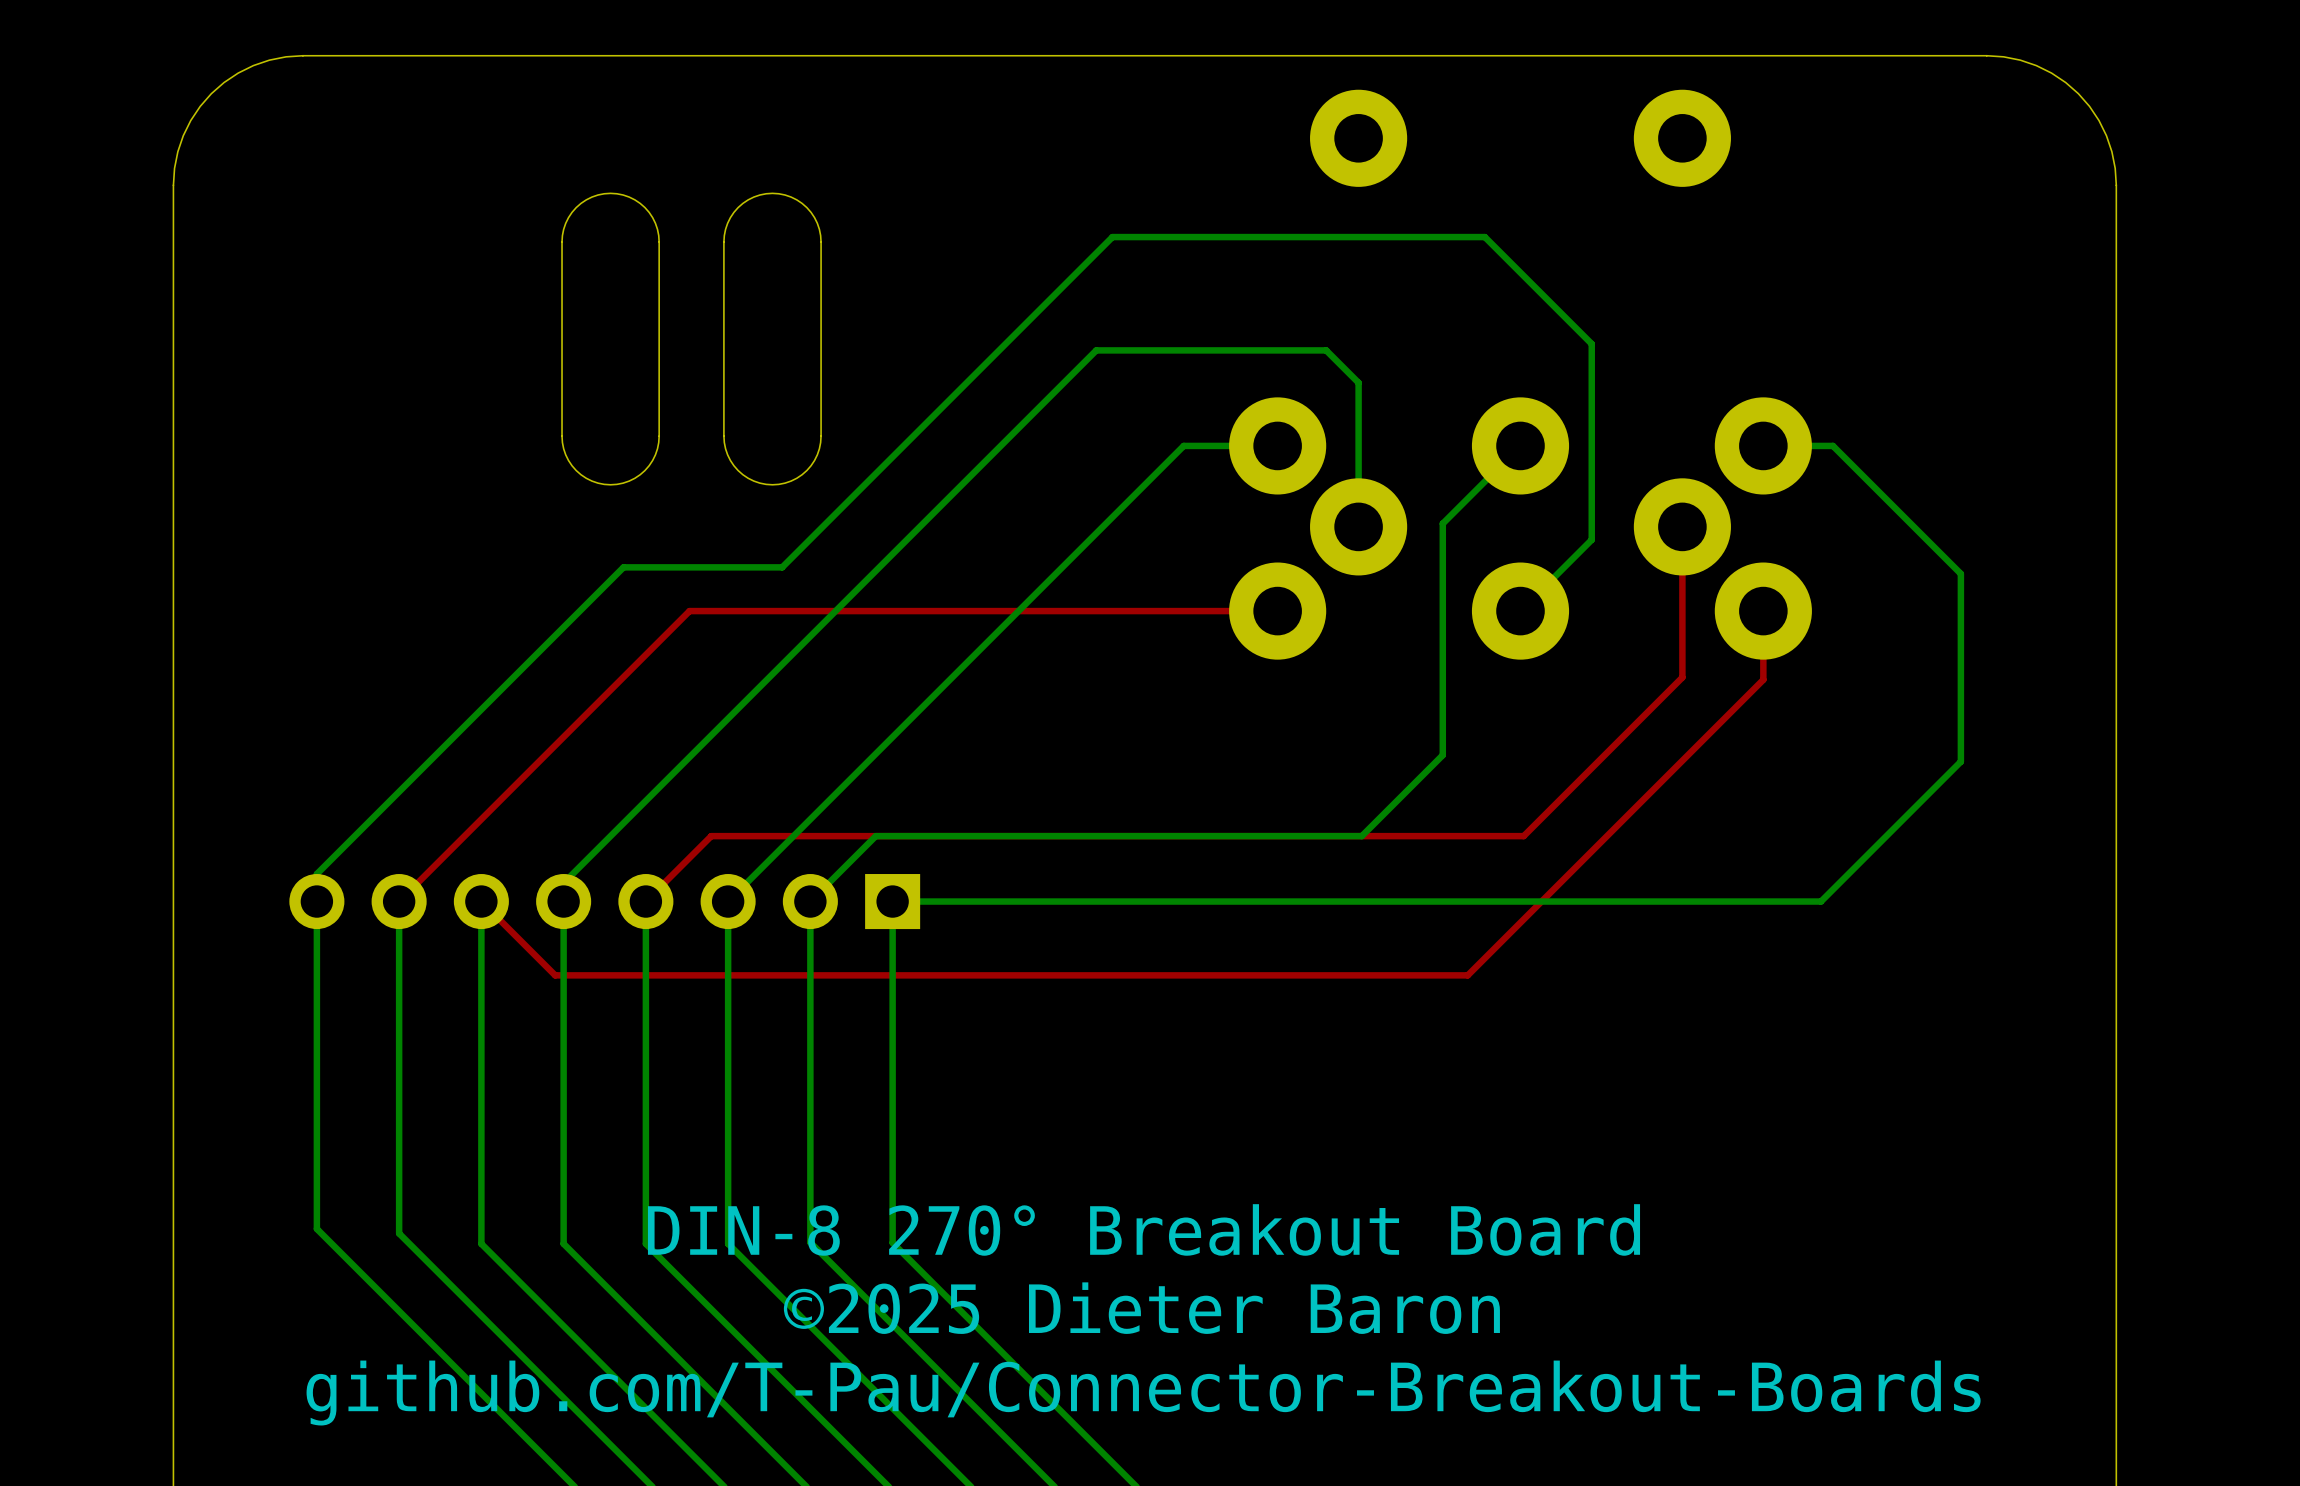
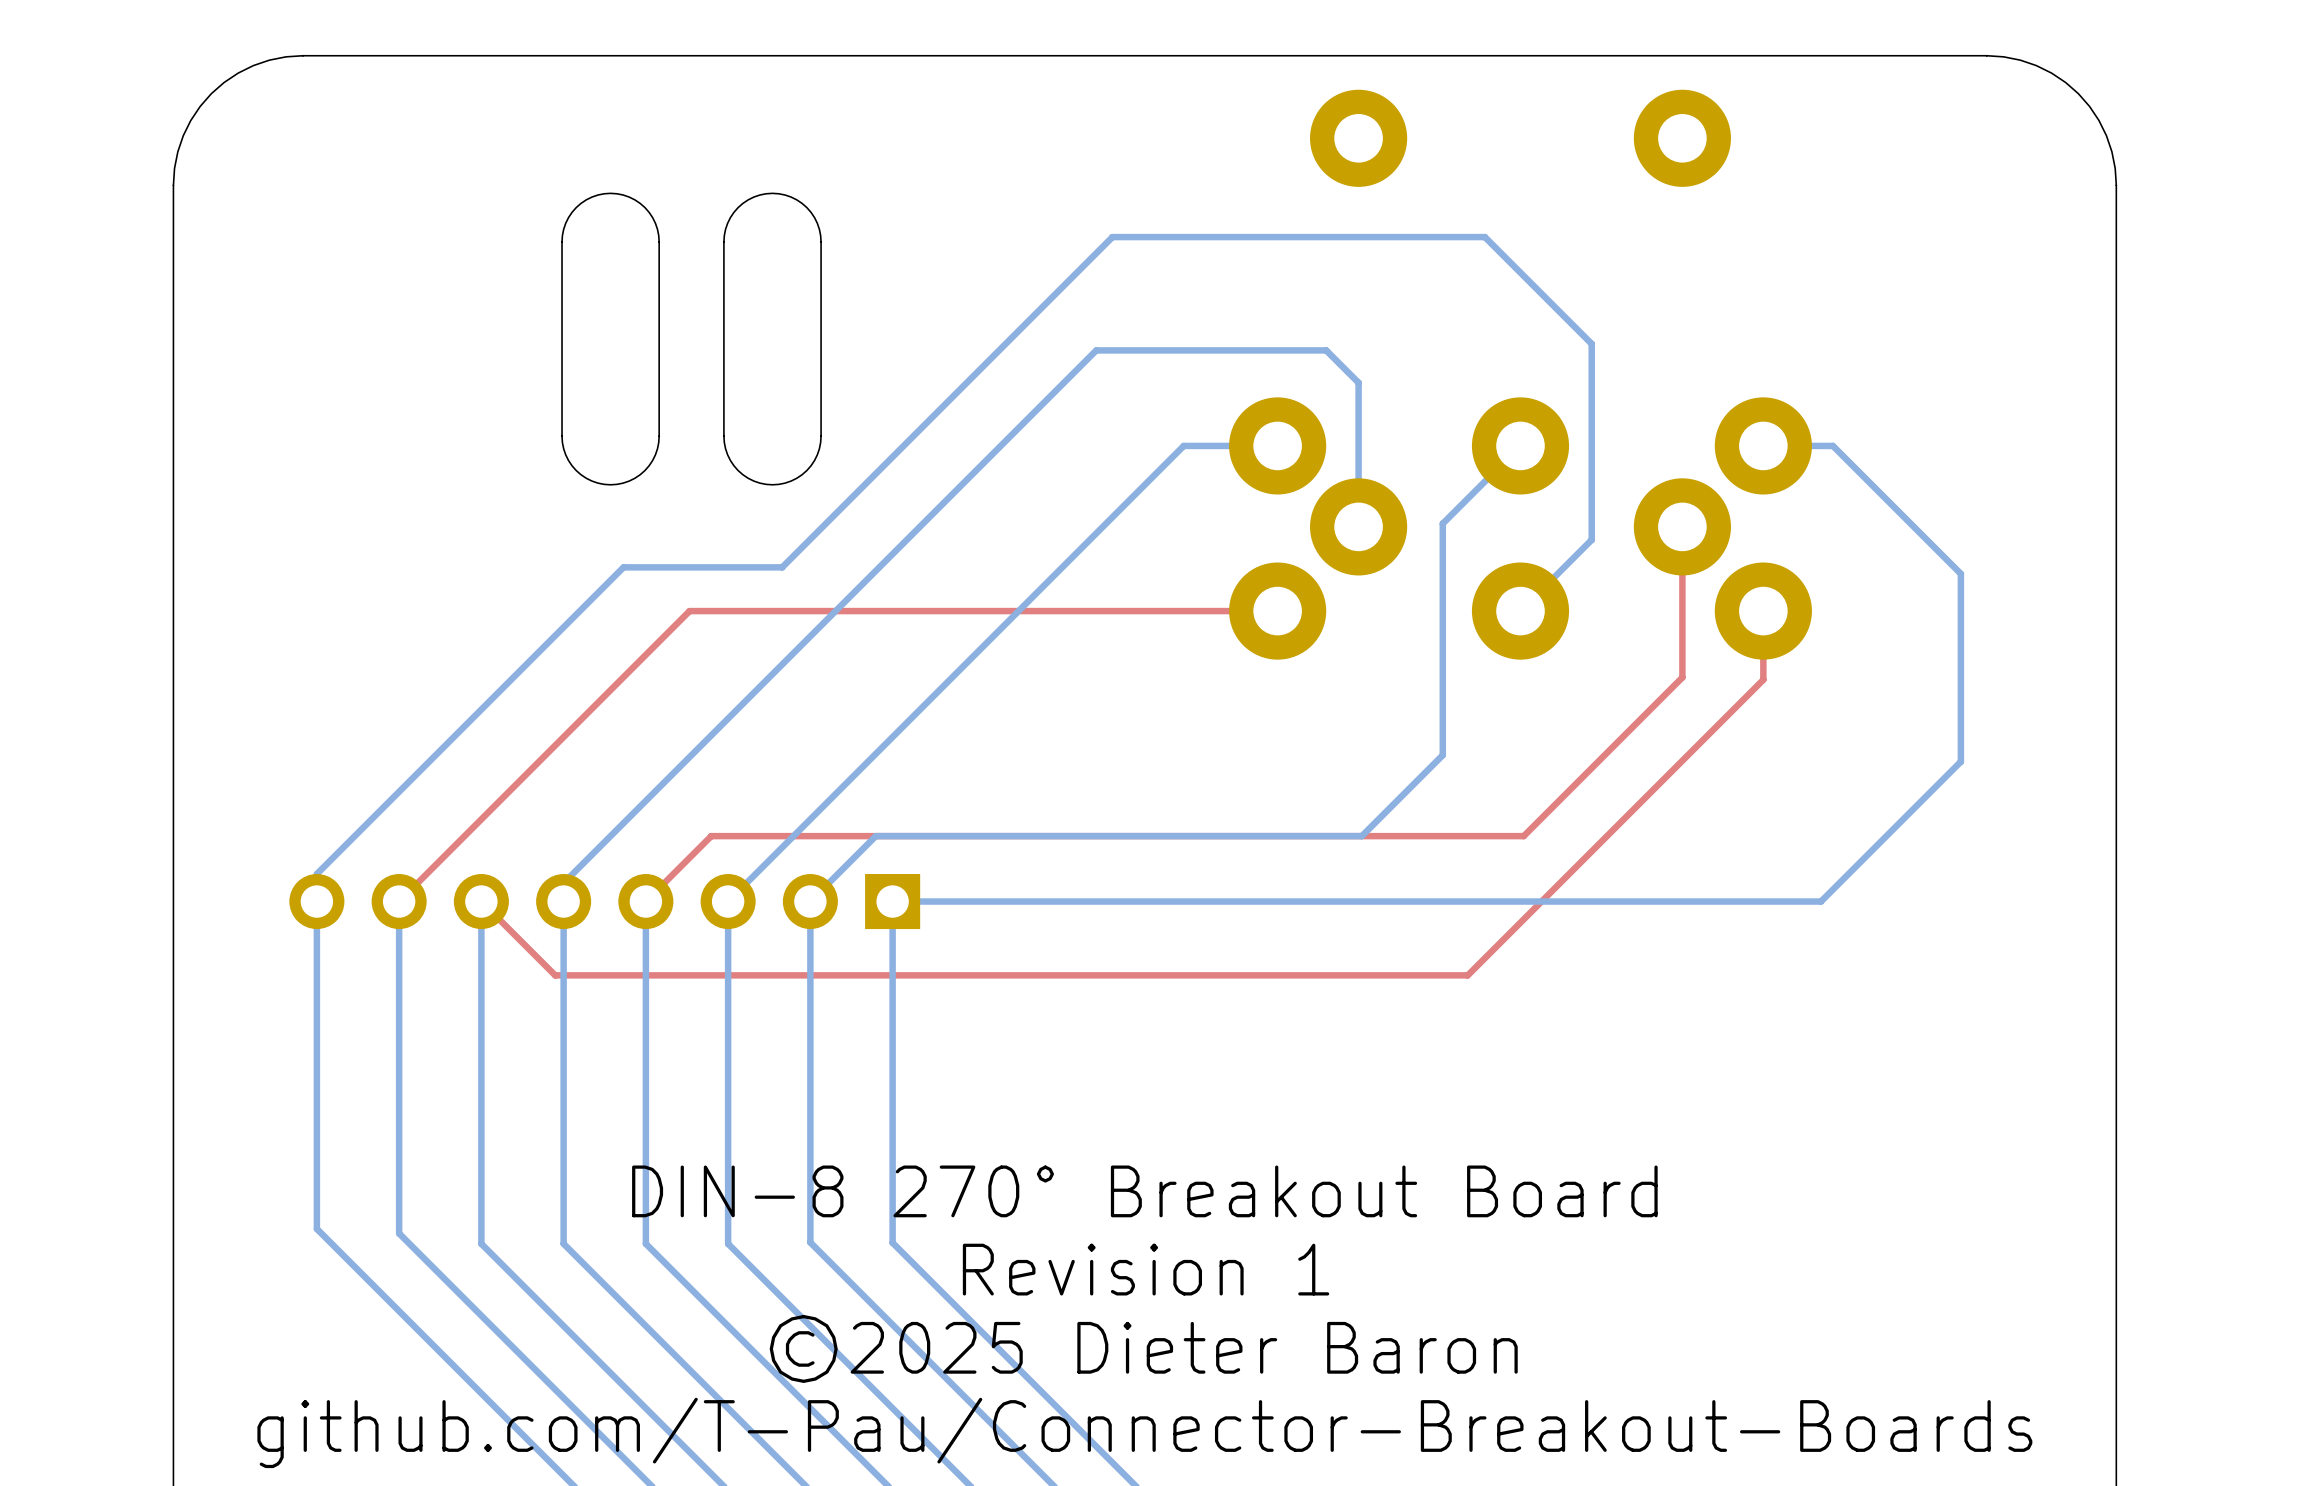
text position: DIN-8 270° Breakout Board (1143, 1229) -> DIN-8 270° Breakout Board (1144, 1191)
text: none -> Revision 1 (1146, 1269)
text position: ©2025 Dieter Baron (1141, 1308) -> ©2025 Dieter Baron (1143, 1348)
text position: github.com/T-Pau/Connector-Breakout-Boards (1143, 1393) -> github.com/T-Pau/Connector-Breakout-Boards (1144, 1432)

